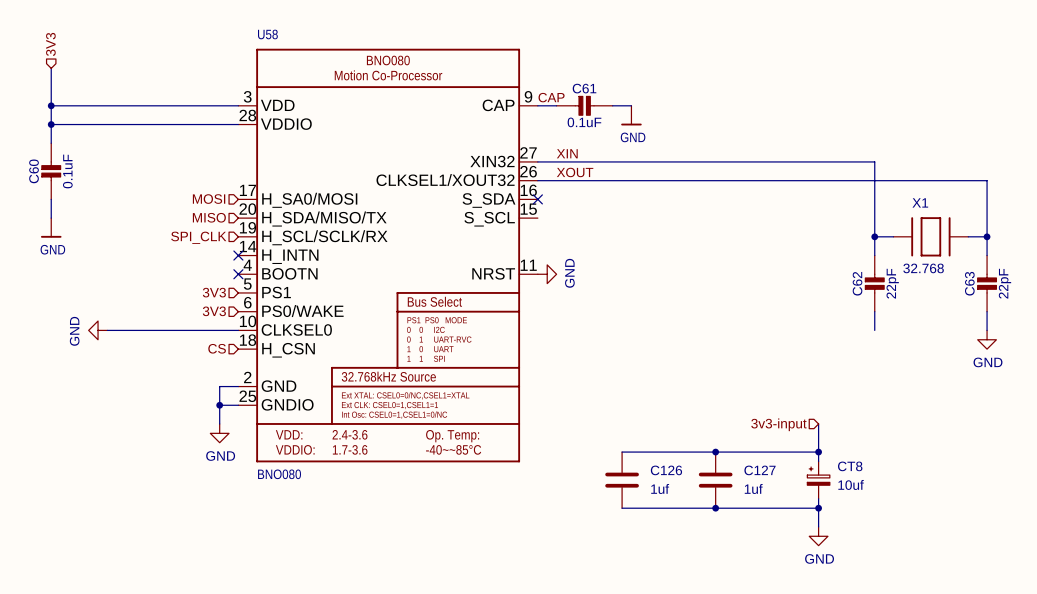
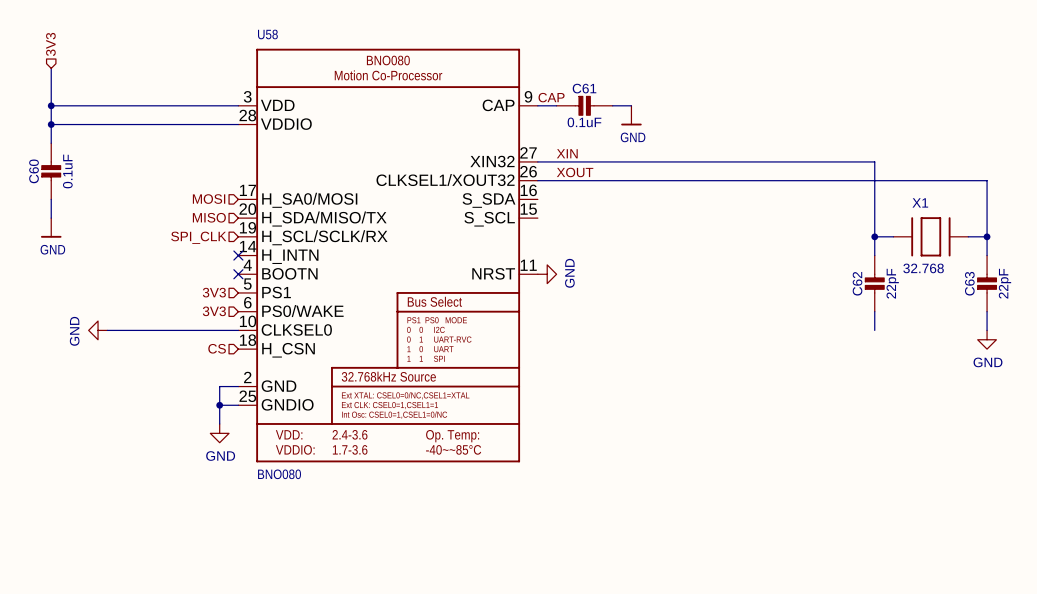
no-connect mark: (537, 199) -> none
wire: (818, 423) (818, 461) -> none
hierarchical label: 3v3-input (778, 424) -> none
wire: (622, 452) (818, 452) -> none
junction: (715, 452) -> none
junction: (818, 452) -> none
C126: 1uf (622, 480) -> none
C127: 1uf (715, 480) -> none
CT8: 10uf (818, 480) -> none
wire: (818, 498) (818, 526) -> none
wire: (622, 508) (818, 508) -> none
junction: (715, 508) -> none
junction: (818, 508) -> none
power symbol: GND (818, 536) -> none

